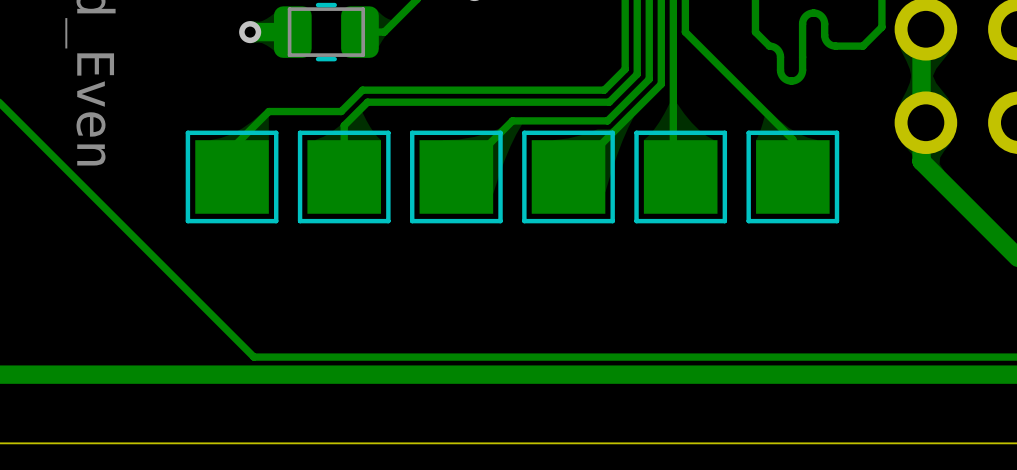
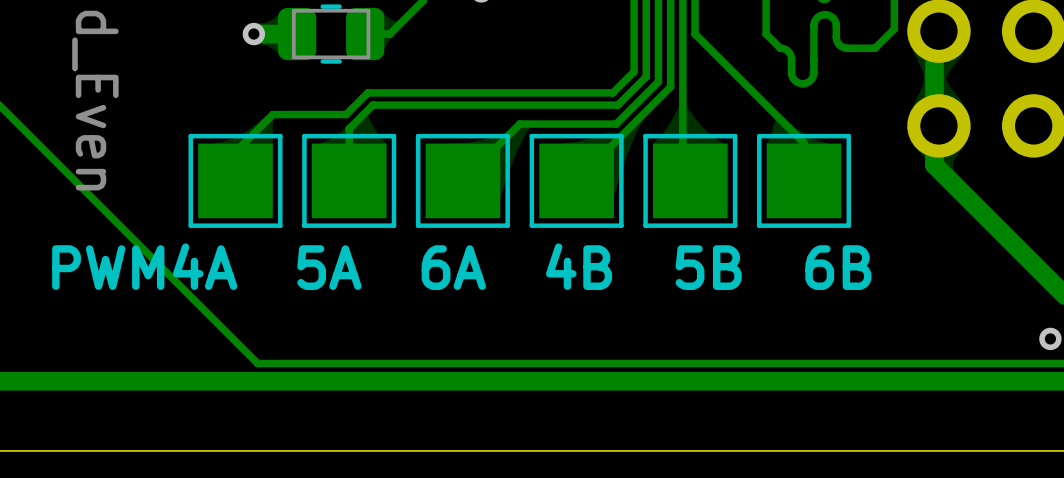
text: none -> PWM4A 5A 6A 4B 5B 6B (461, 266)

